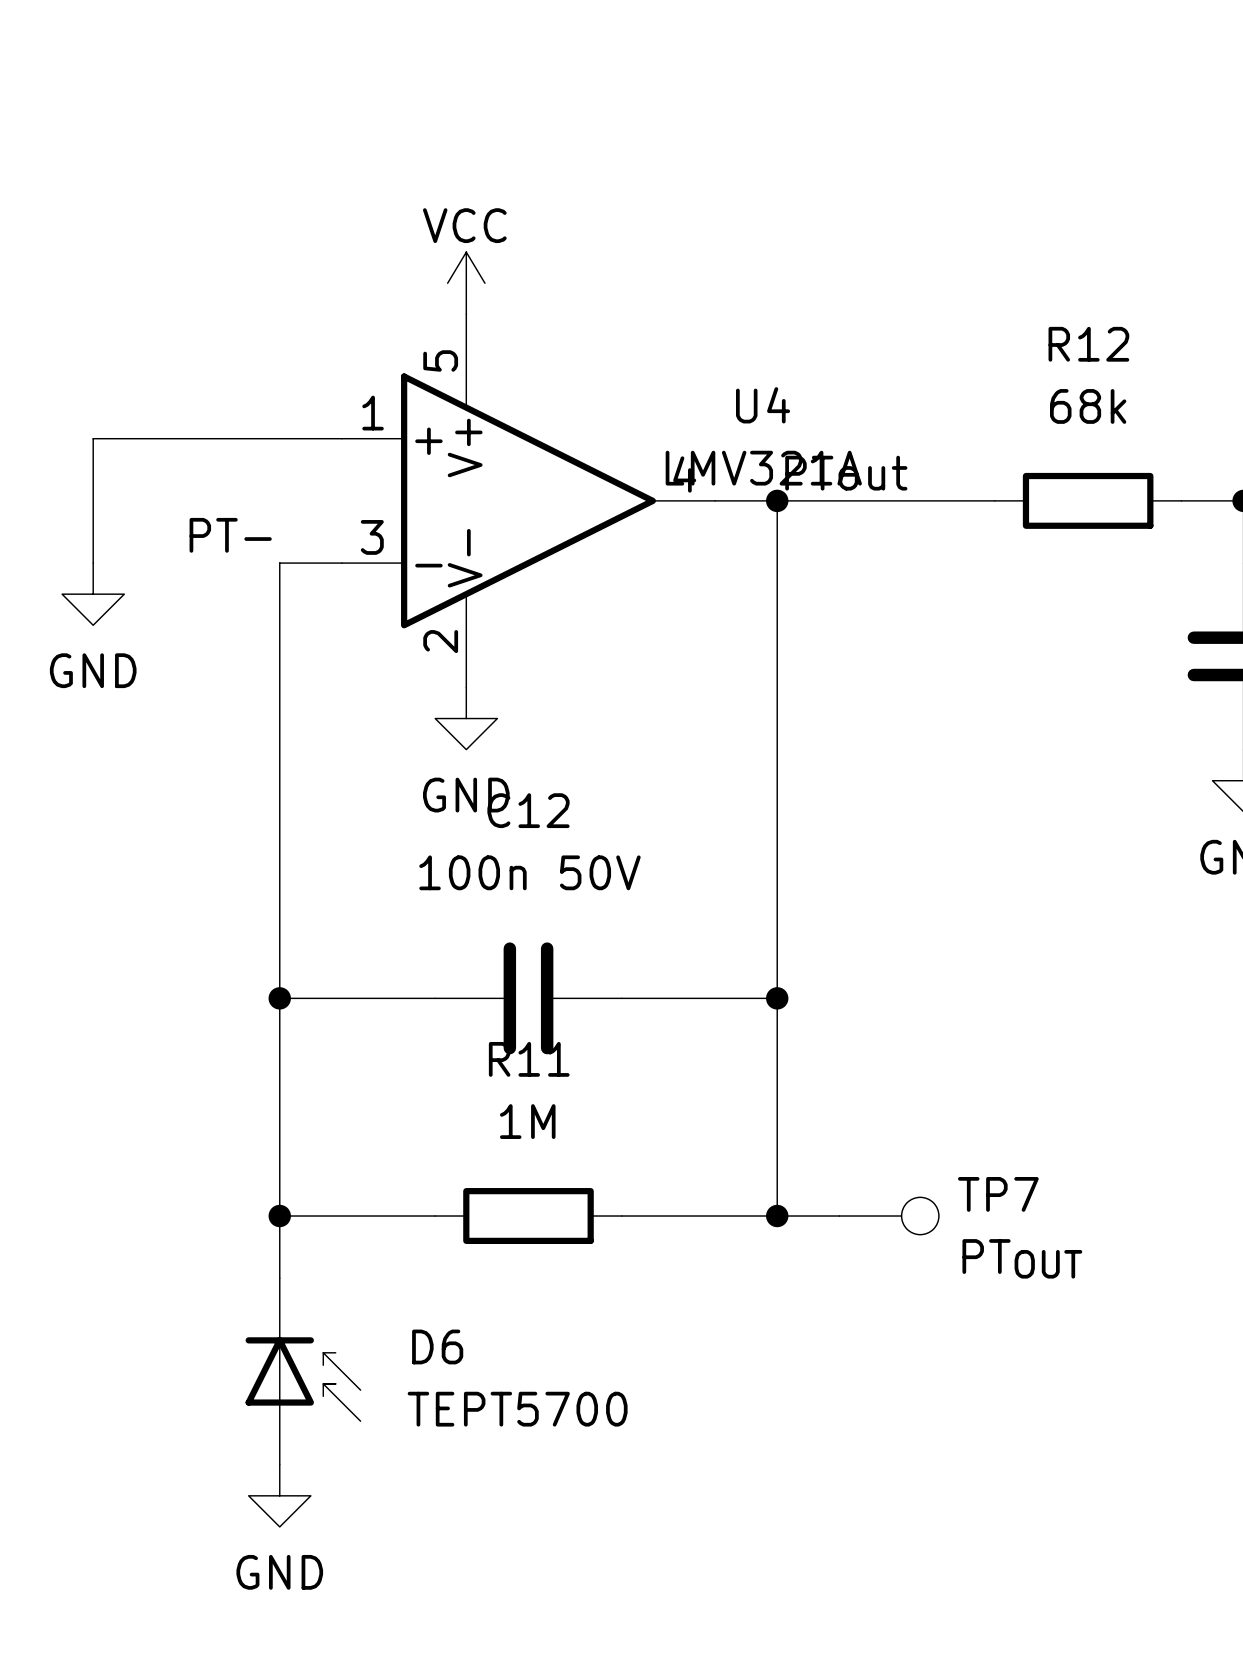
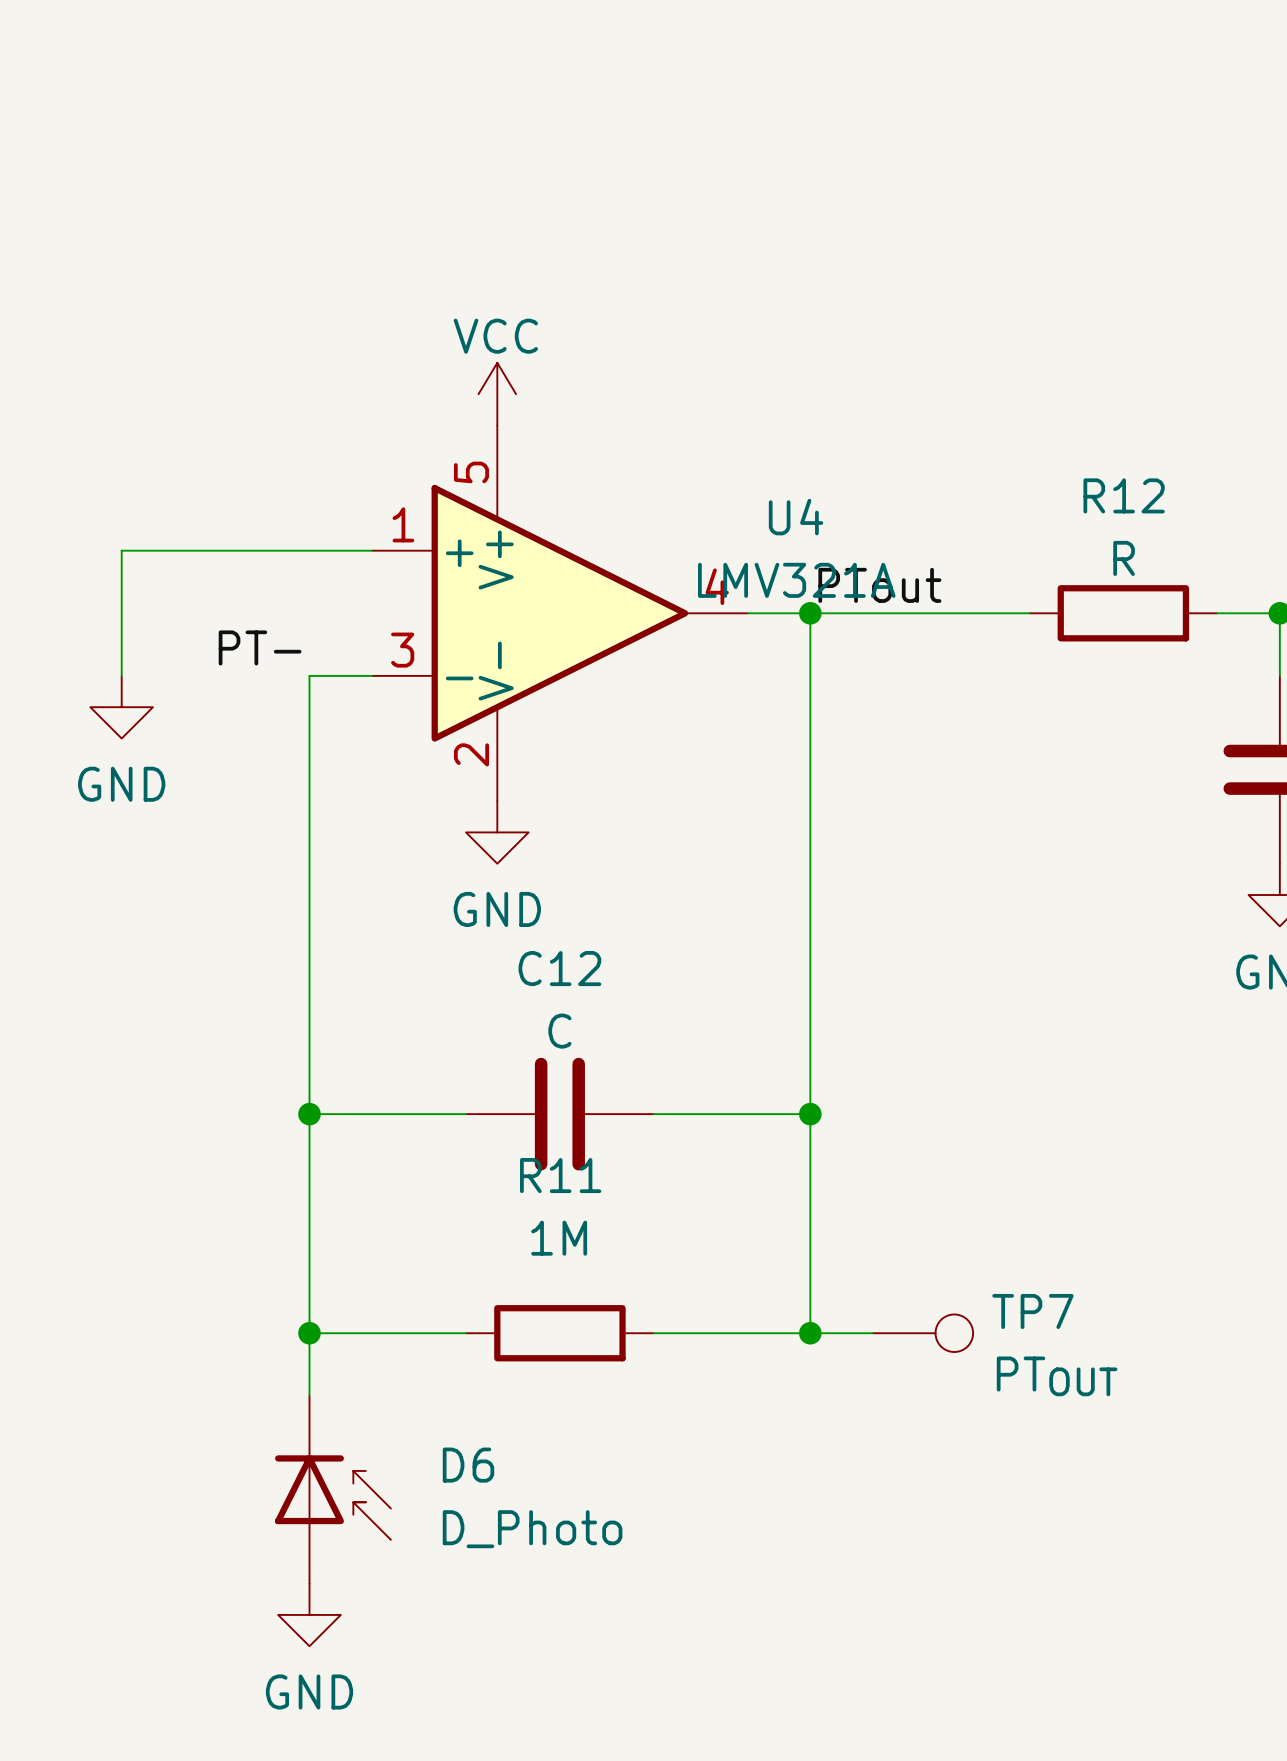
R12 name position: R12 (1088, 344) -> R12 (1124, 495)
R12 value: 68k (1088, 406) -> R (1124, 558)
C12 name position: C12 (528, 810) -> C12 (559, 968)
C12 value: 100n 50V (529, 872) -> C (559, 1031)
D6 value: TEPT5700 (517, 1409) -> D_Photo (532, 1529)

